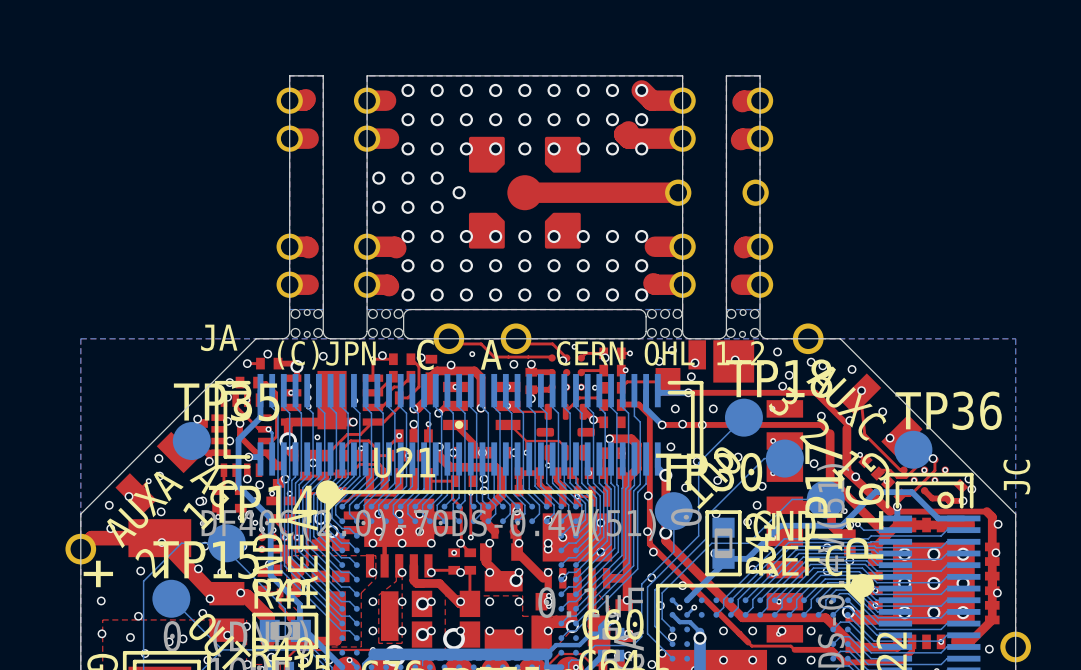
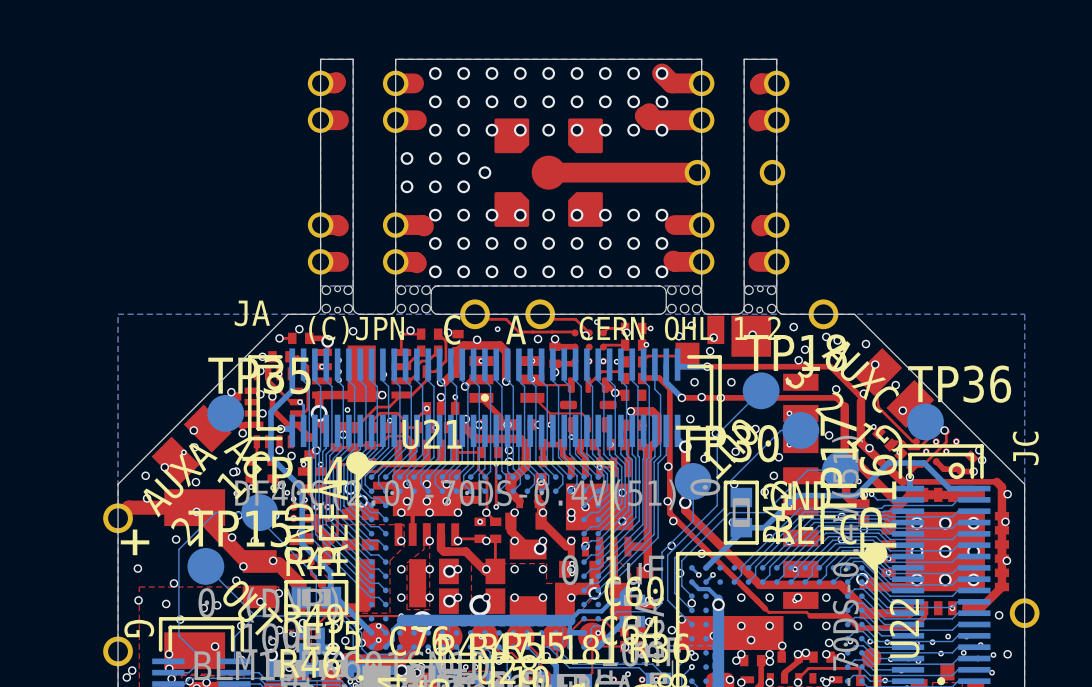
part footprint: [839, 373, 923, 457] -> [854, 347, 935, 429]
part footprint: [115, 431, 199, 515] -> [151, 404, 232, 485]

